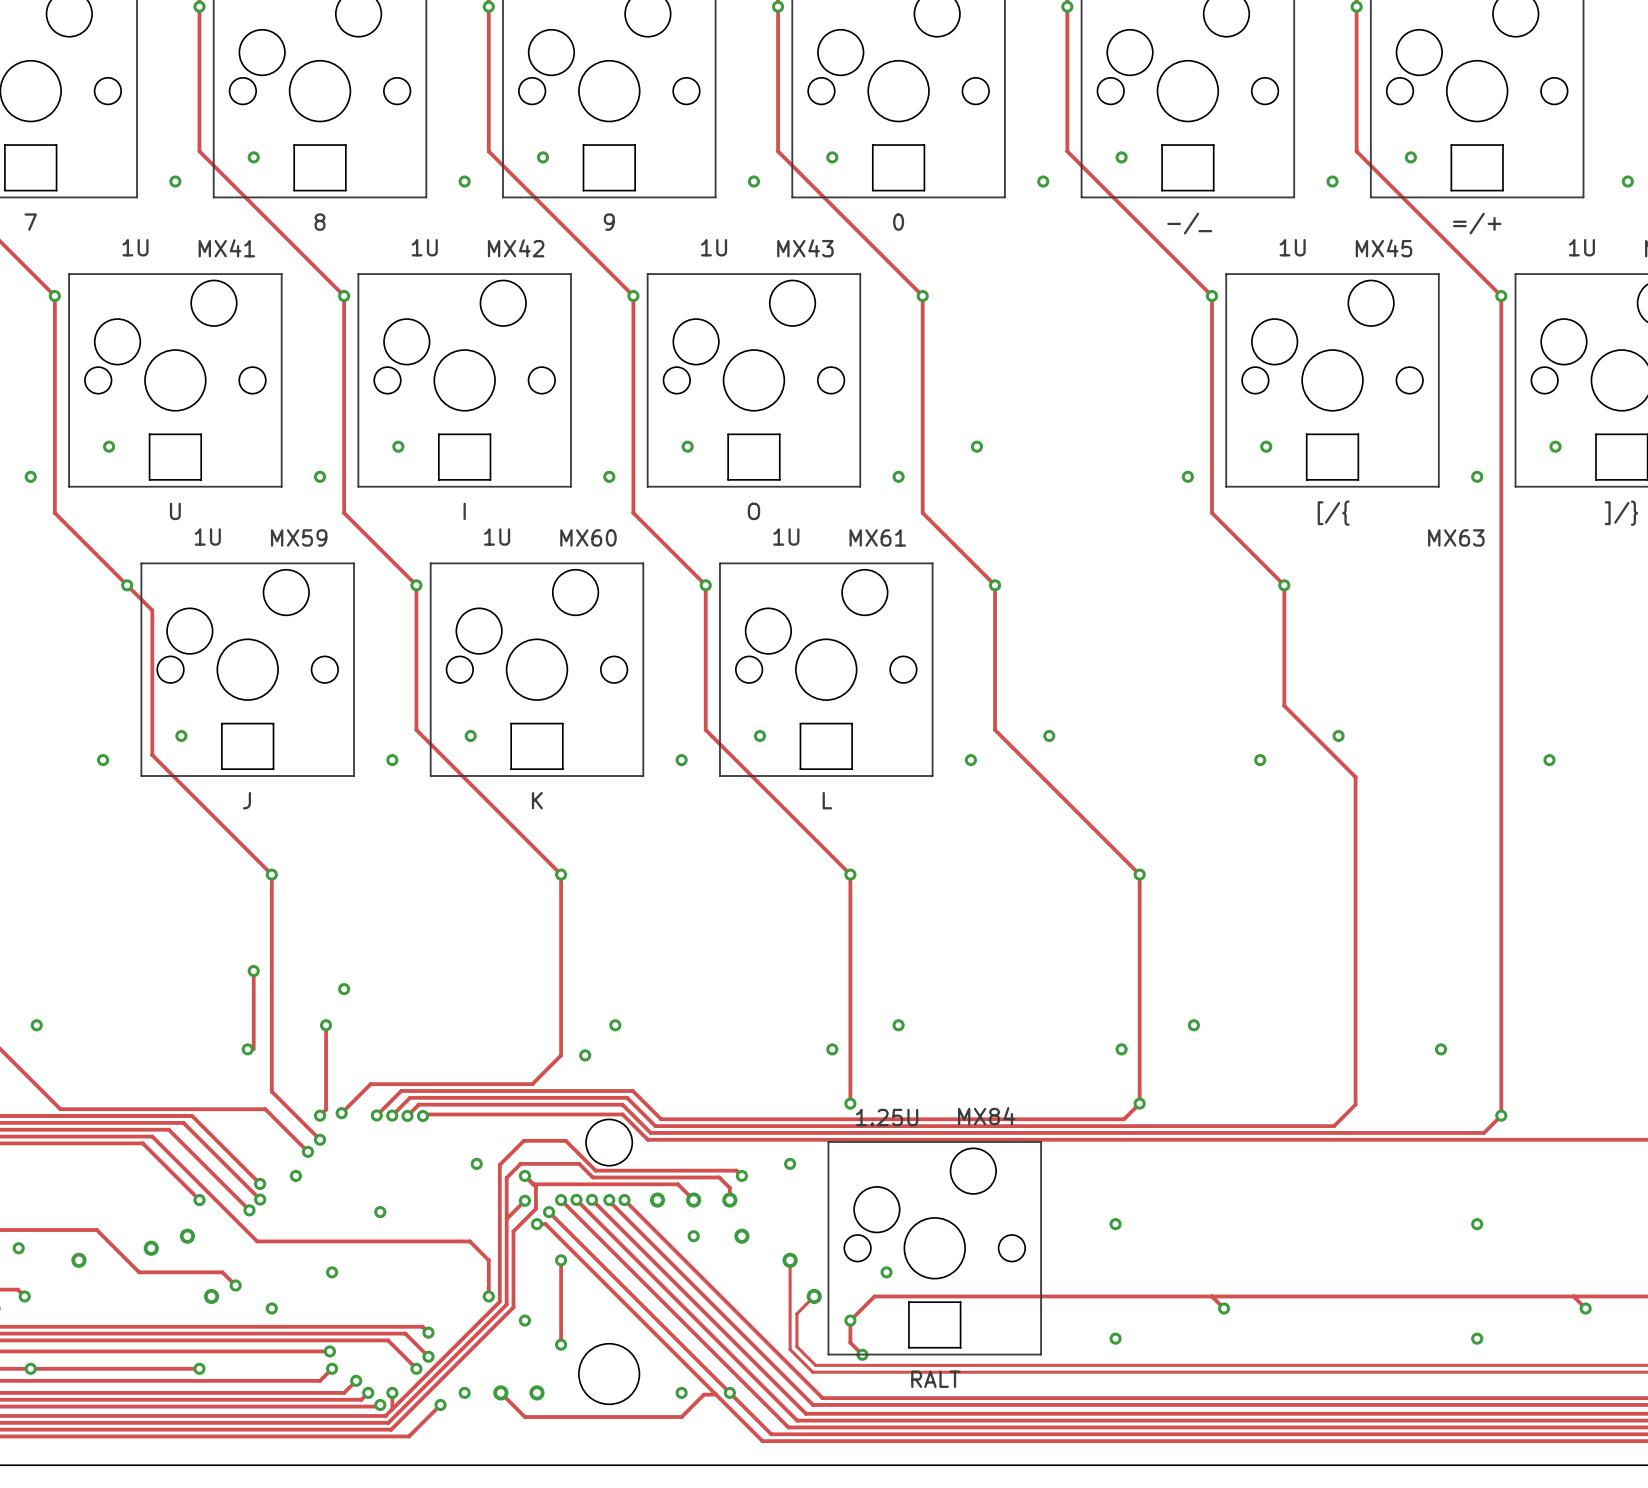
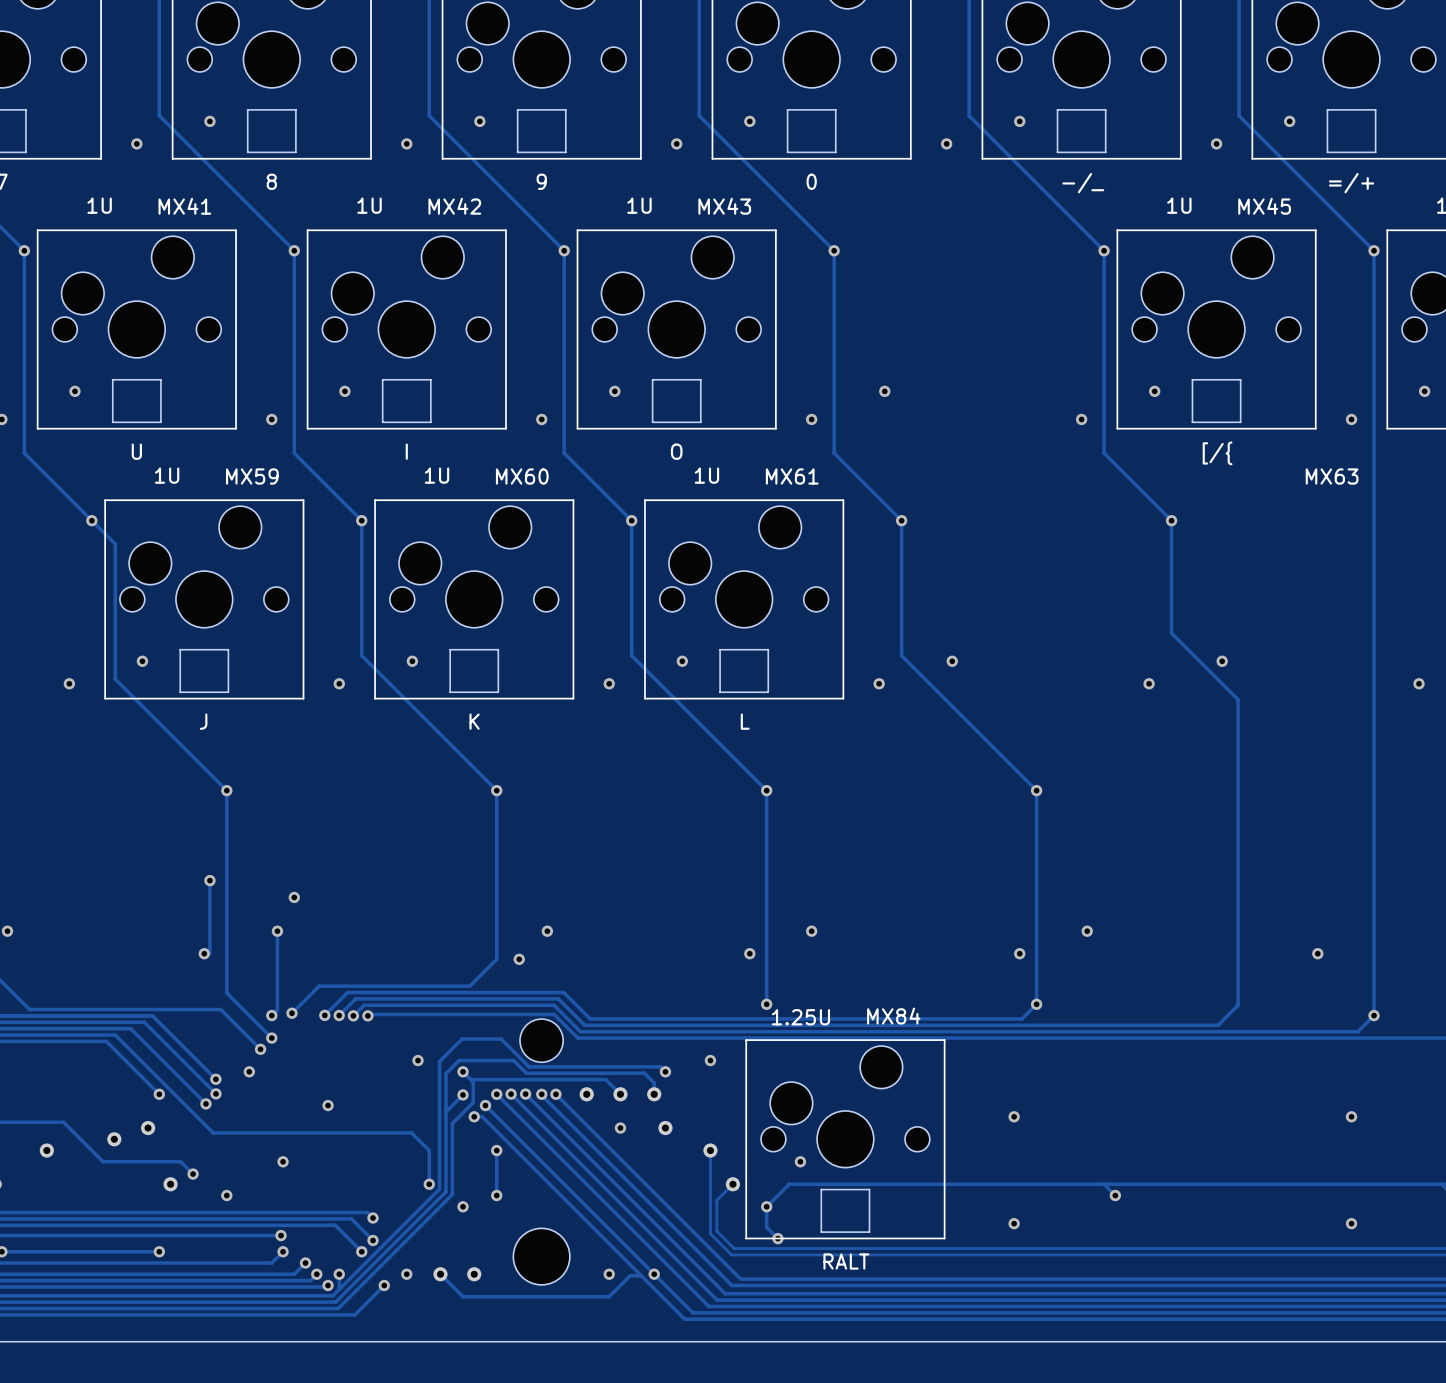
track: (561, 1308) (561, 1344) -> none
via position: (561, 1344) -> (496, 1195)

